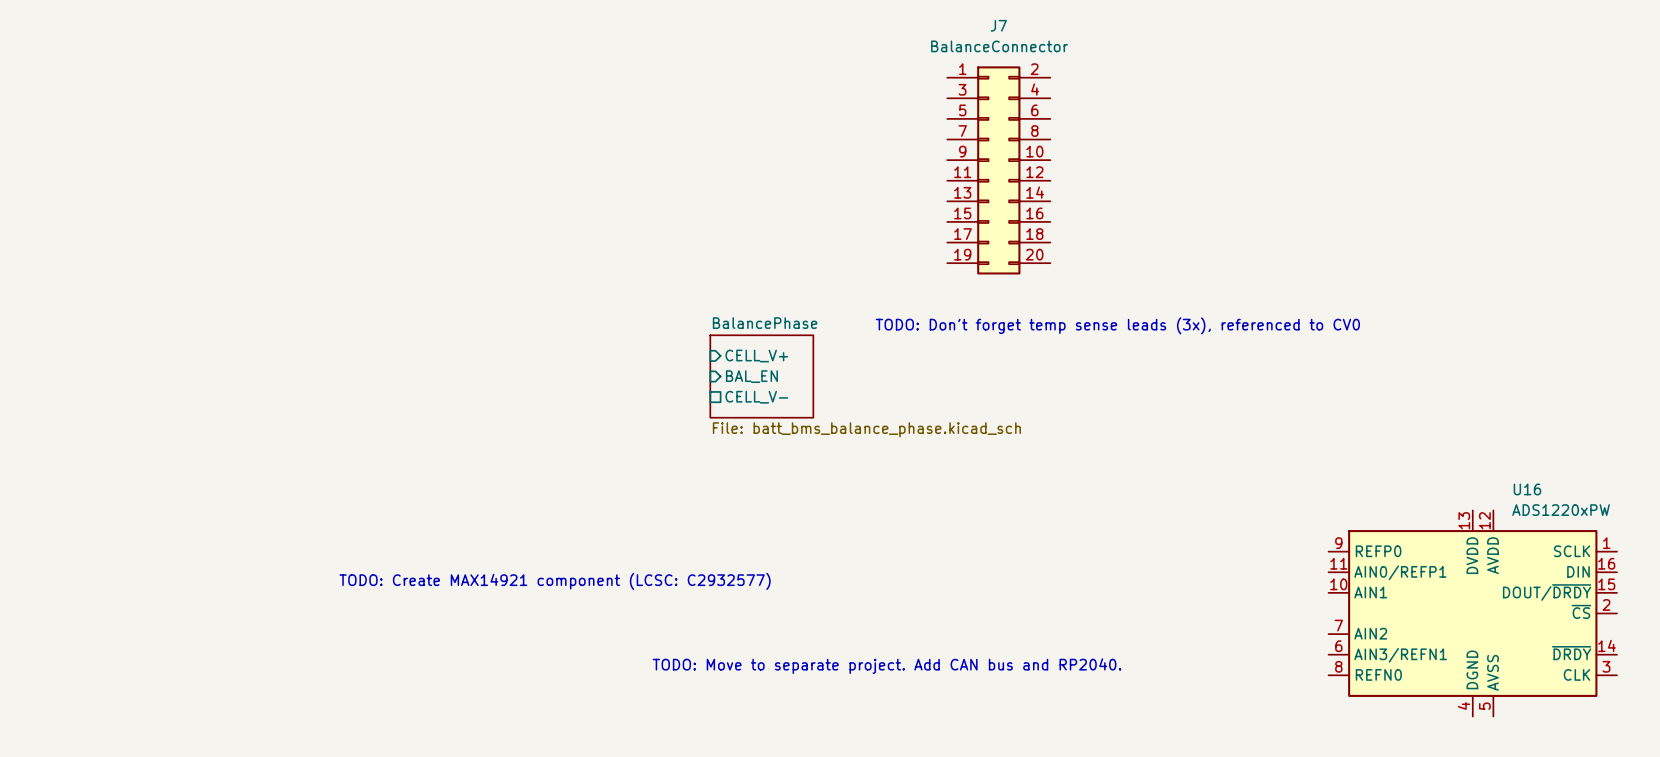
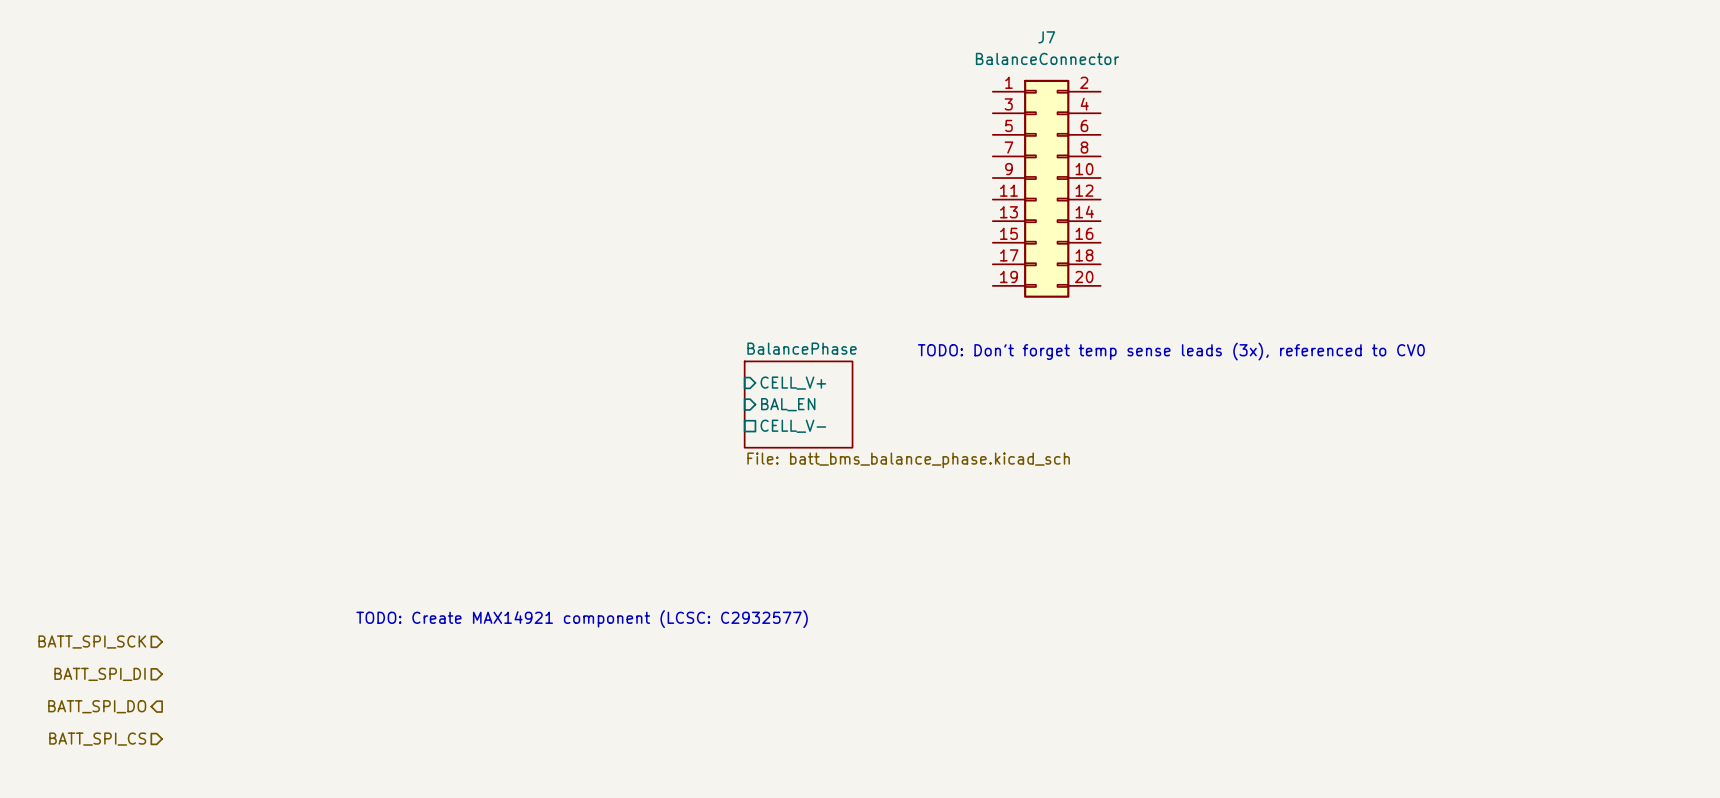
hierarchical label: none -> BATT_SPI_SCK (92, 642)
U16: ADS1220xPW (1472, 613) -> none
hierarchical label: none -> BATT_SPI_DI (100, 674)
hierarchical label: none -> BATT_SPI_DO (97, 706)
text: TODO: Move to separate project. Add CAN bus and RP2040. (887, 666) -> none
hierarchical label: none -> BATT_SPI_CS (97, 739)

